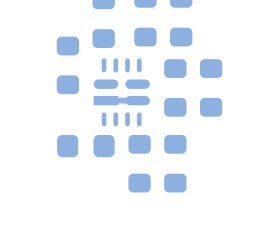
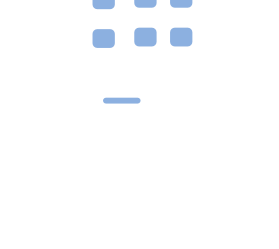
part: (67, 65) -> none
part: (175, 87) -> none
part: (211, 87) -> none
part: (121, 92) -> none
part: (85, 146) -> none
part: (139, 163) -> none
part: (175, 163) -> none

